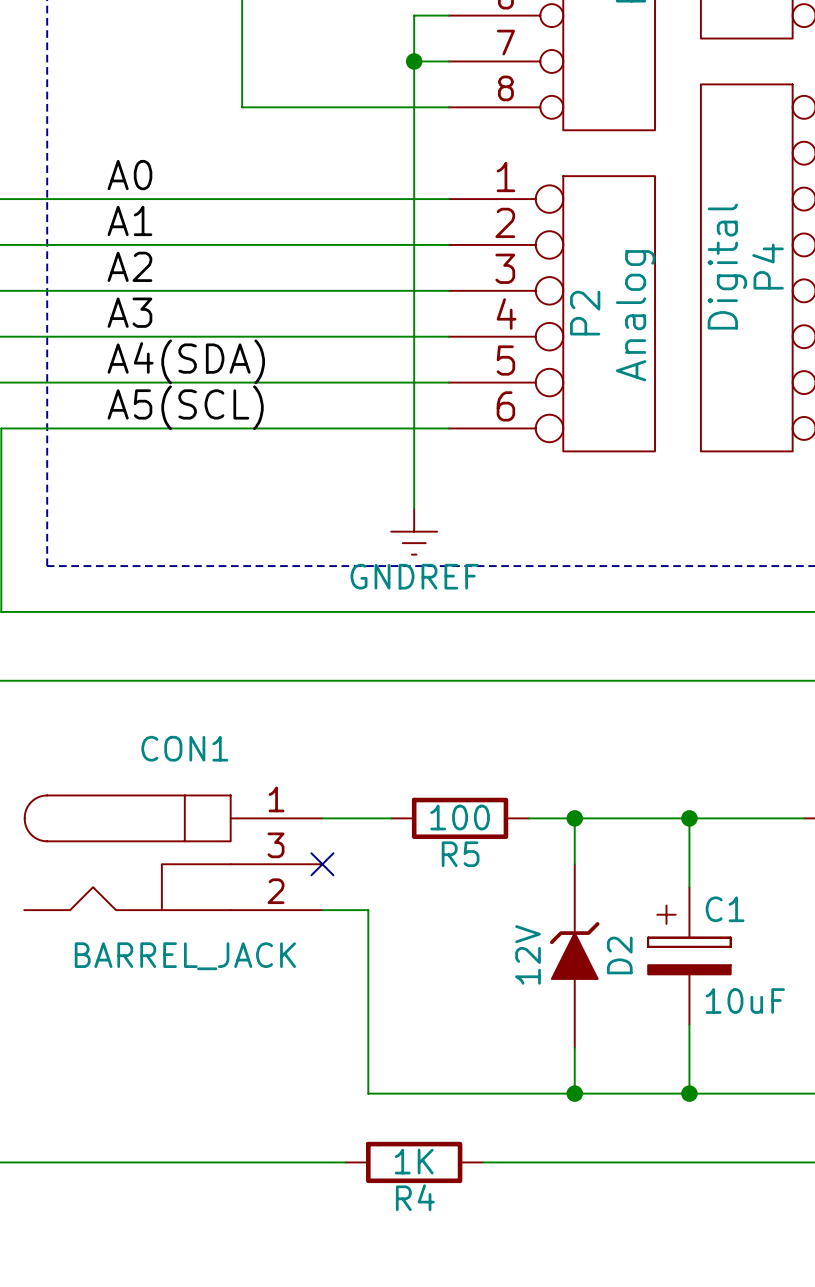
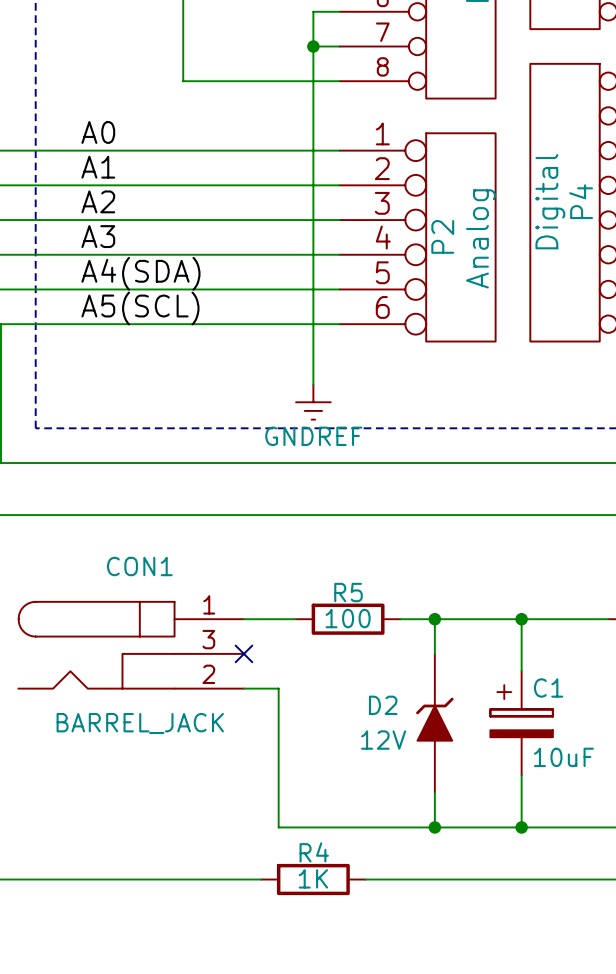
R5 name position: R5 (460, 854) -> R5 (348, 592)
D2 value rotation: 0° (528, 954) -> 90° clockwise (383, 740)
D2 name rotation: 0° (619, 955) -> 90° clockwise (383, 705)
D2 name position: D2 (619, 955) -> D2 (383, 705)
R4 name position: R4 (415, 1197) -> R4 (314, 852)

